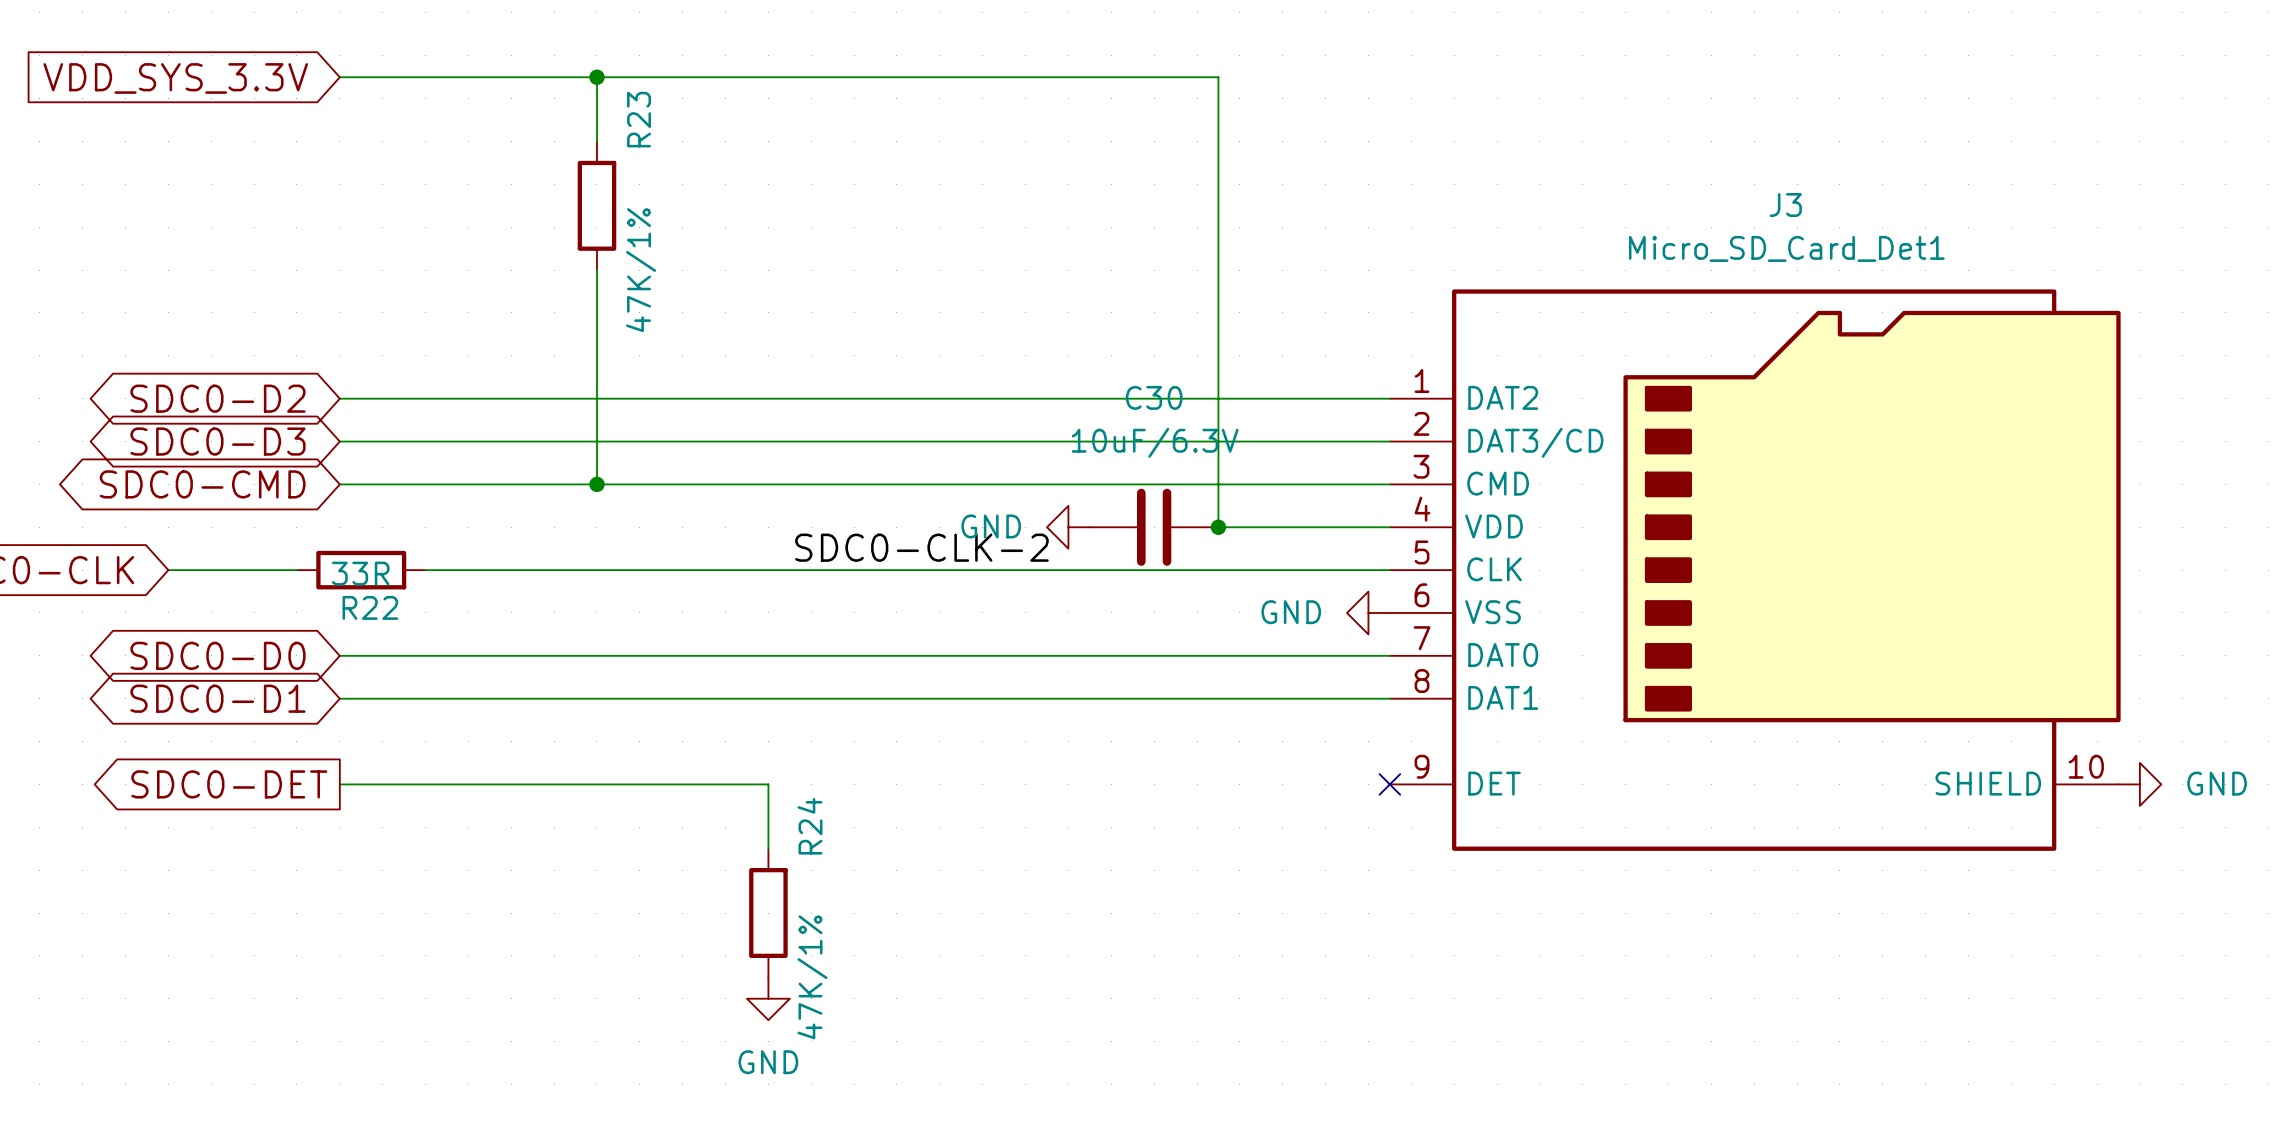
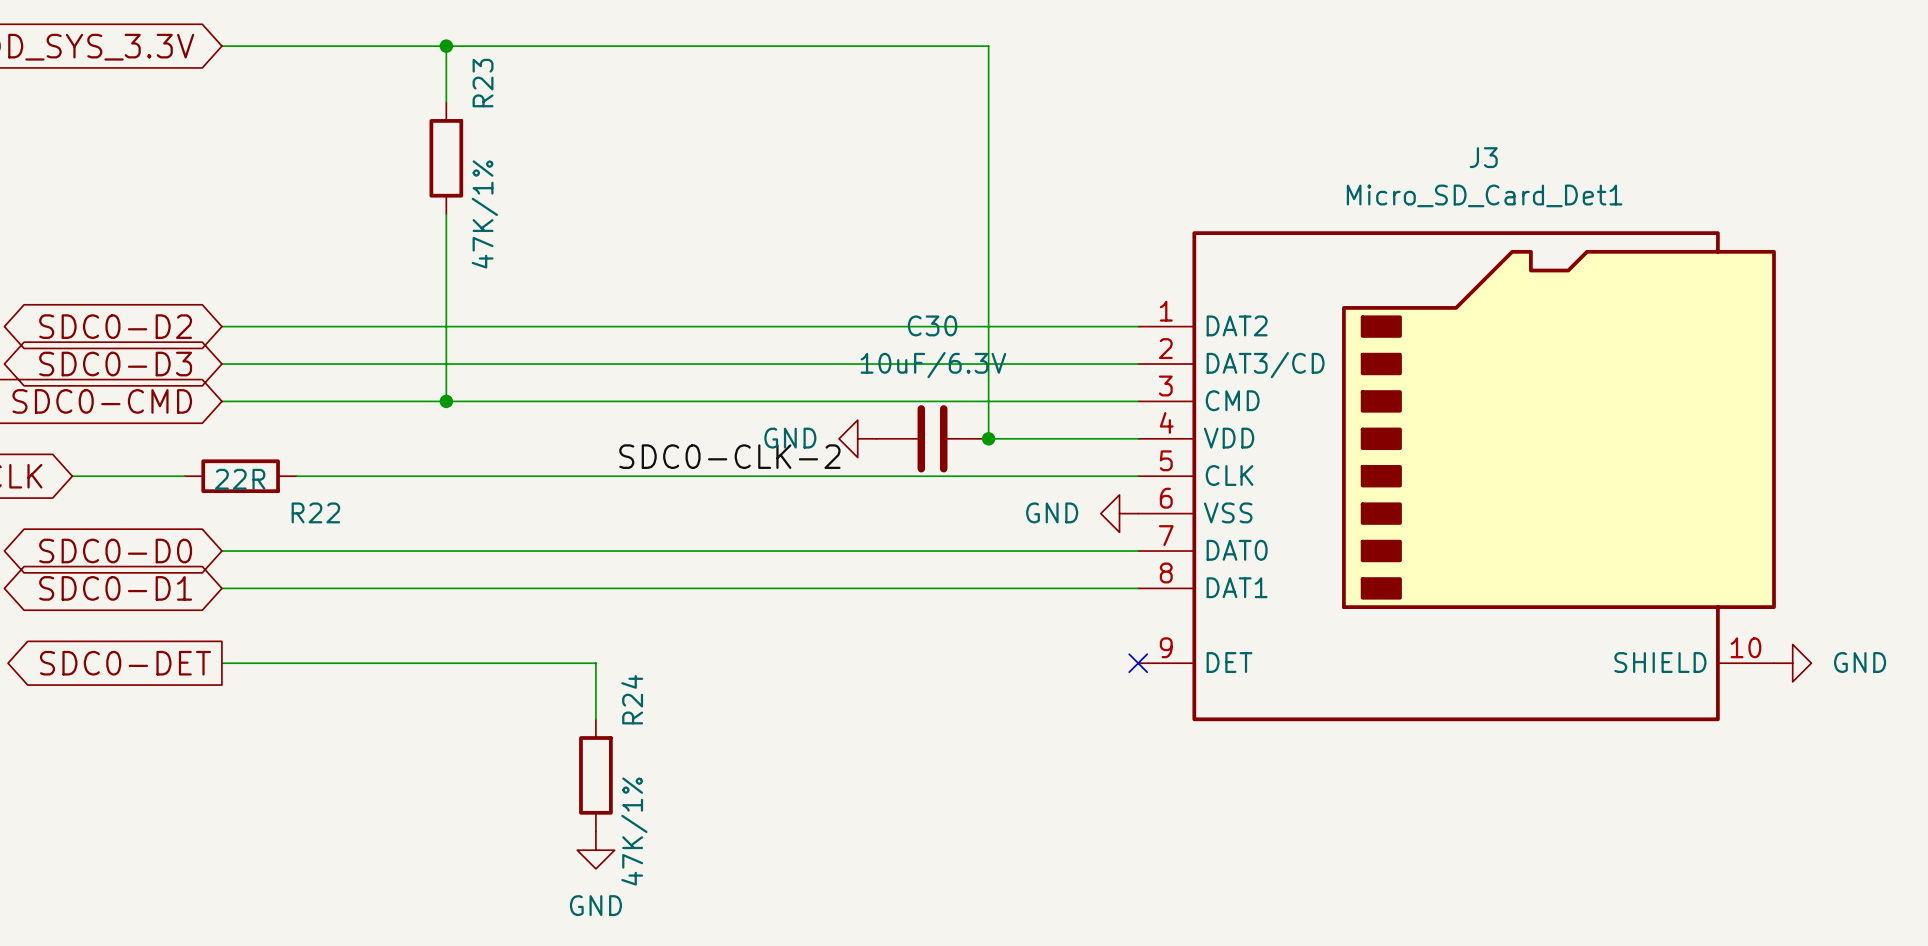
R22 value: 33R (360, 573) -> 22R (240, 479)
R22 name position: R22 (370, 607) -> R22 (315, 512)

